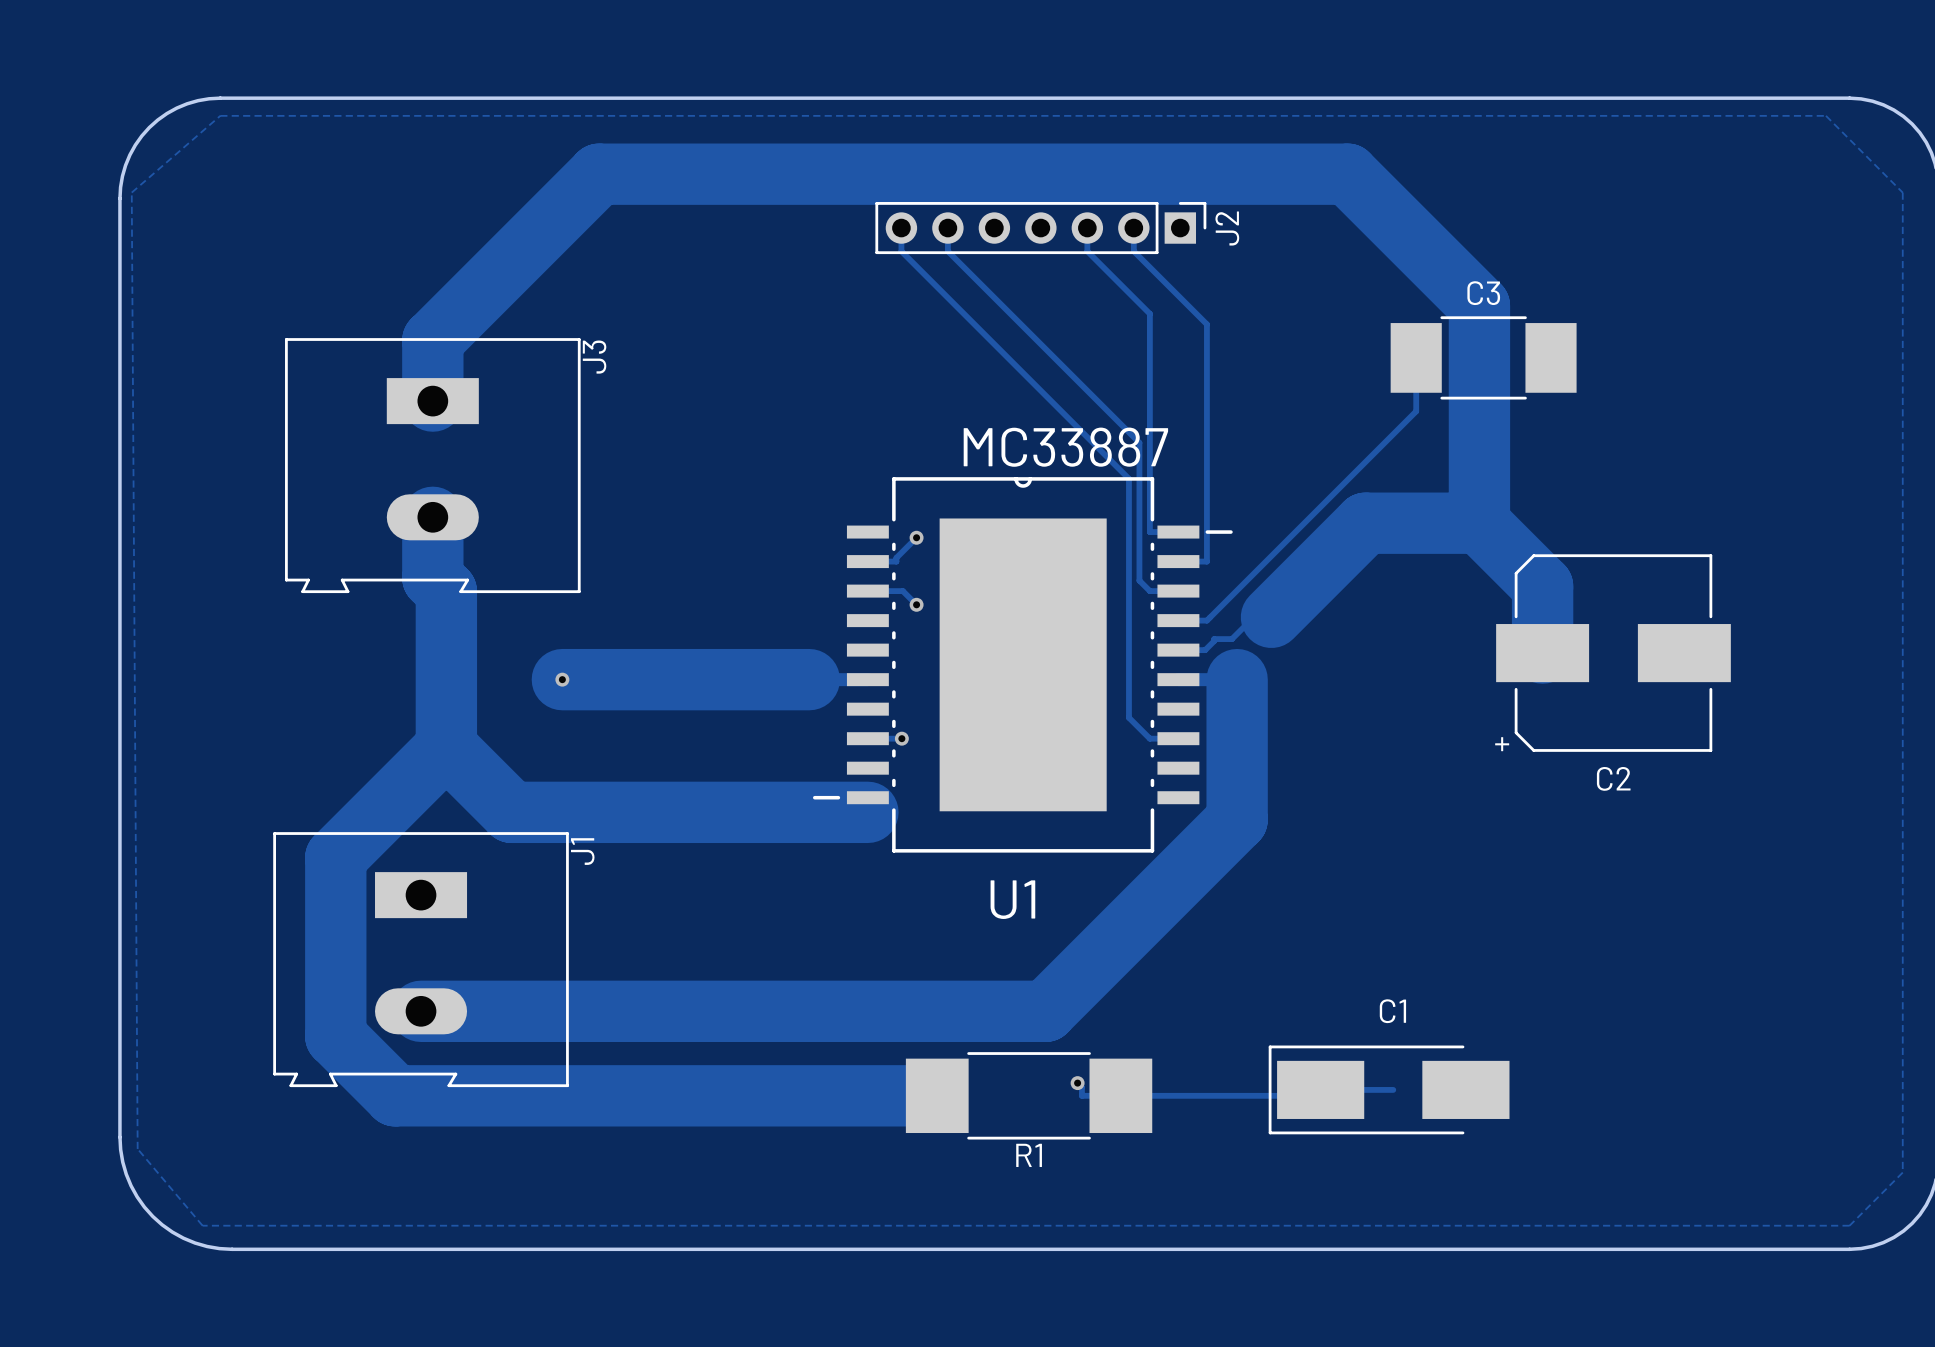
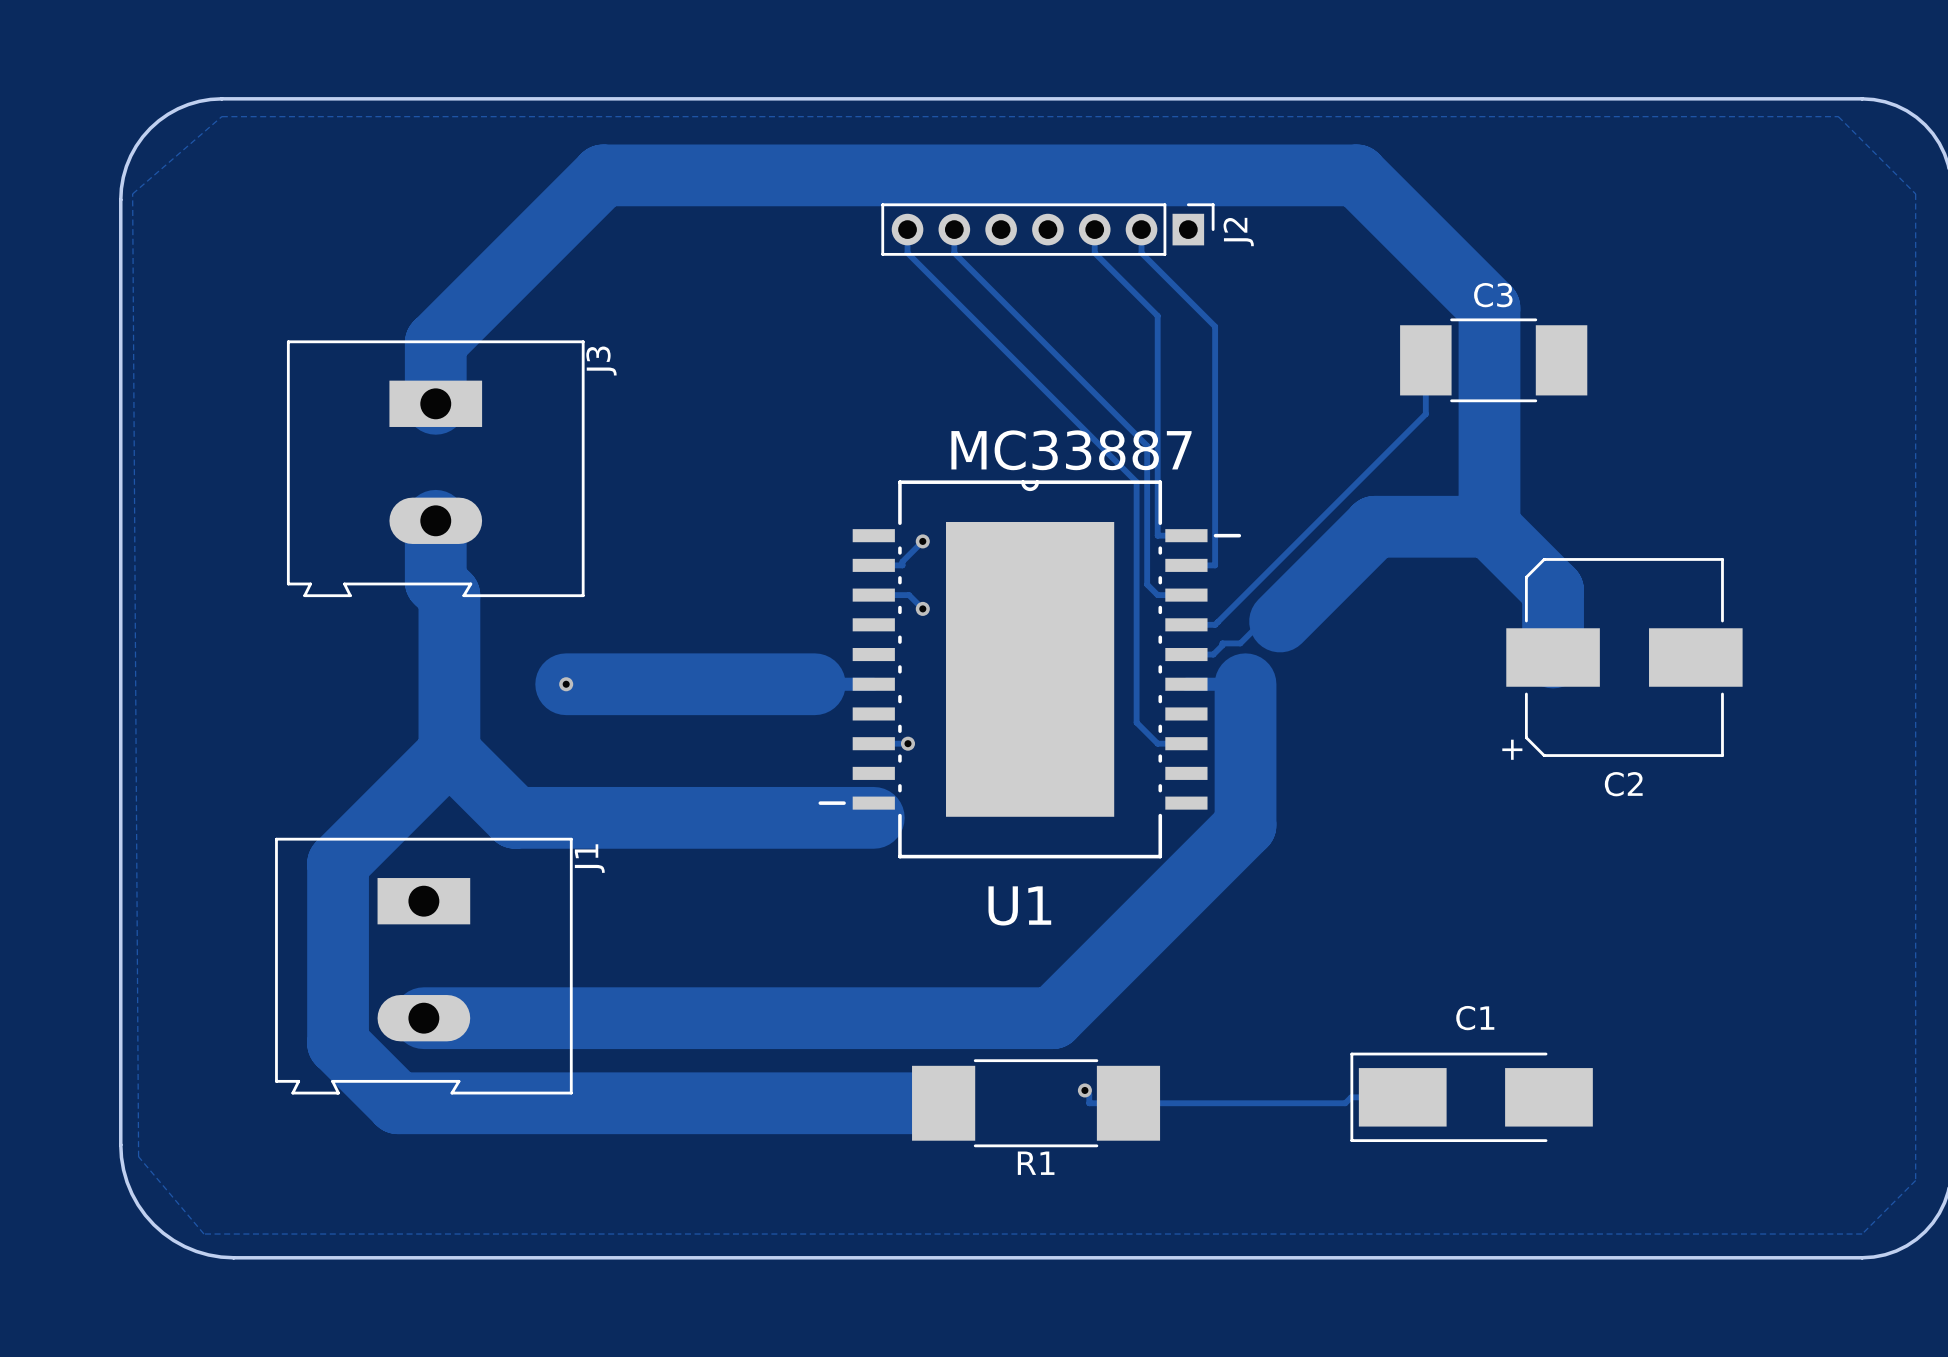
C1 position: (1389, 1089) -> (1471, 1097)

